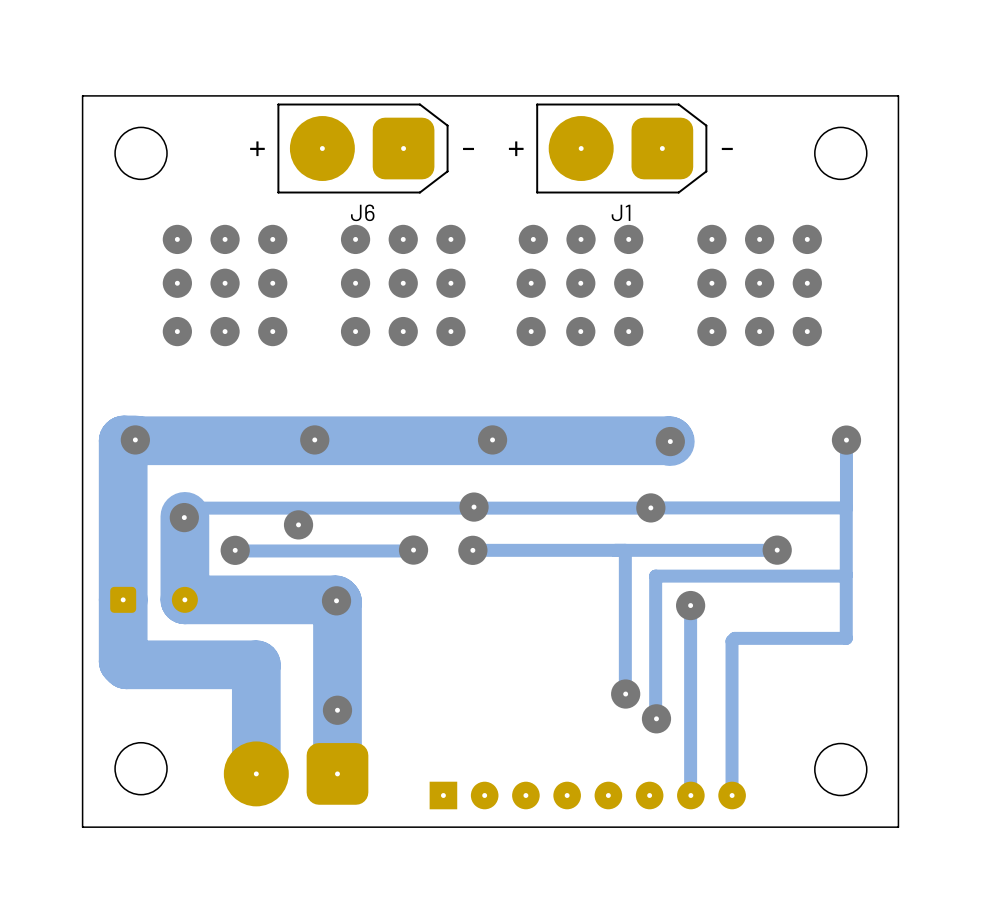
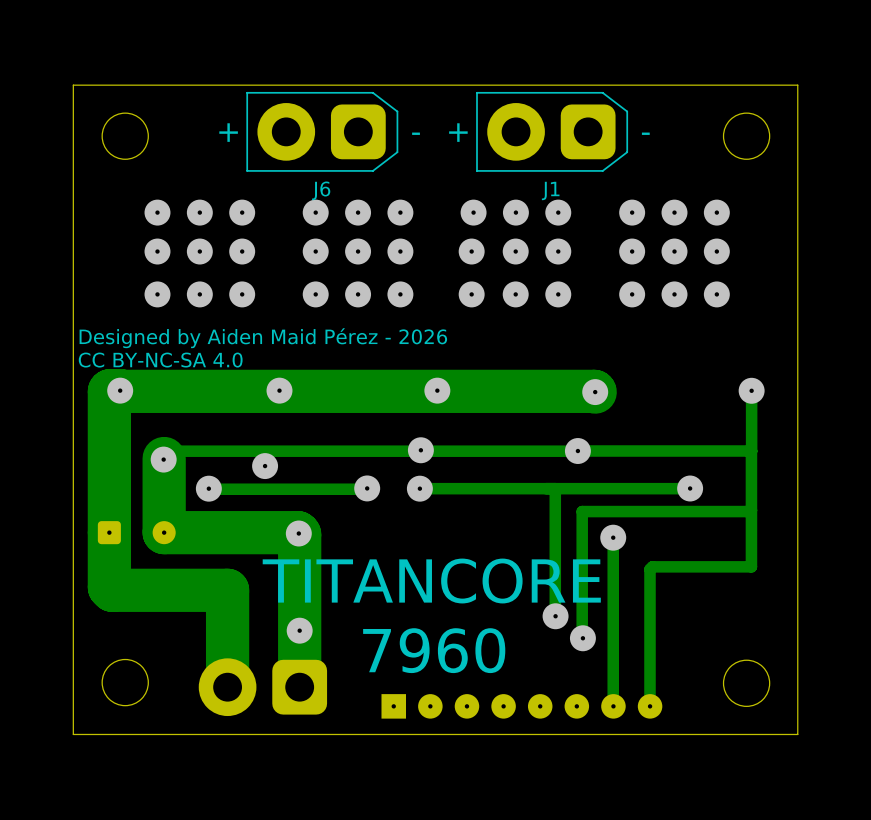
J6 footprint: [277, 103, 449, 194] -> [246, 91, 399, 172]
J1 footprint: [536, 103, 708, 194] -> [476, 91, 629, 172]
text: none -> Designed by Aiden Maid Pérez - 2026 (263, 338)
text: none -> CC BY-NC-SA 4.0 (160, 360)
text: none -> TITANCORE (431, 581)
text: none -> 7960 (434, 650)
part footprint: [223, 741, 369, 807] -> [198, 658, 328, 717]

